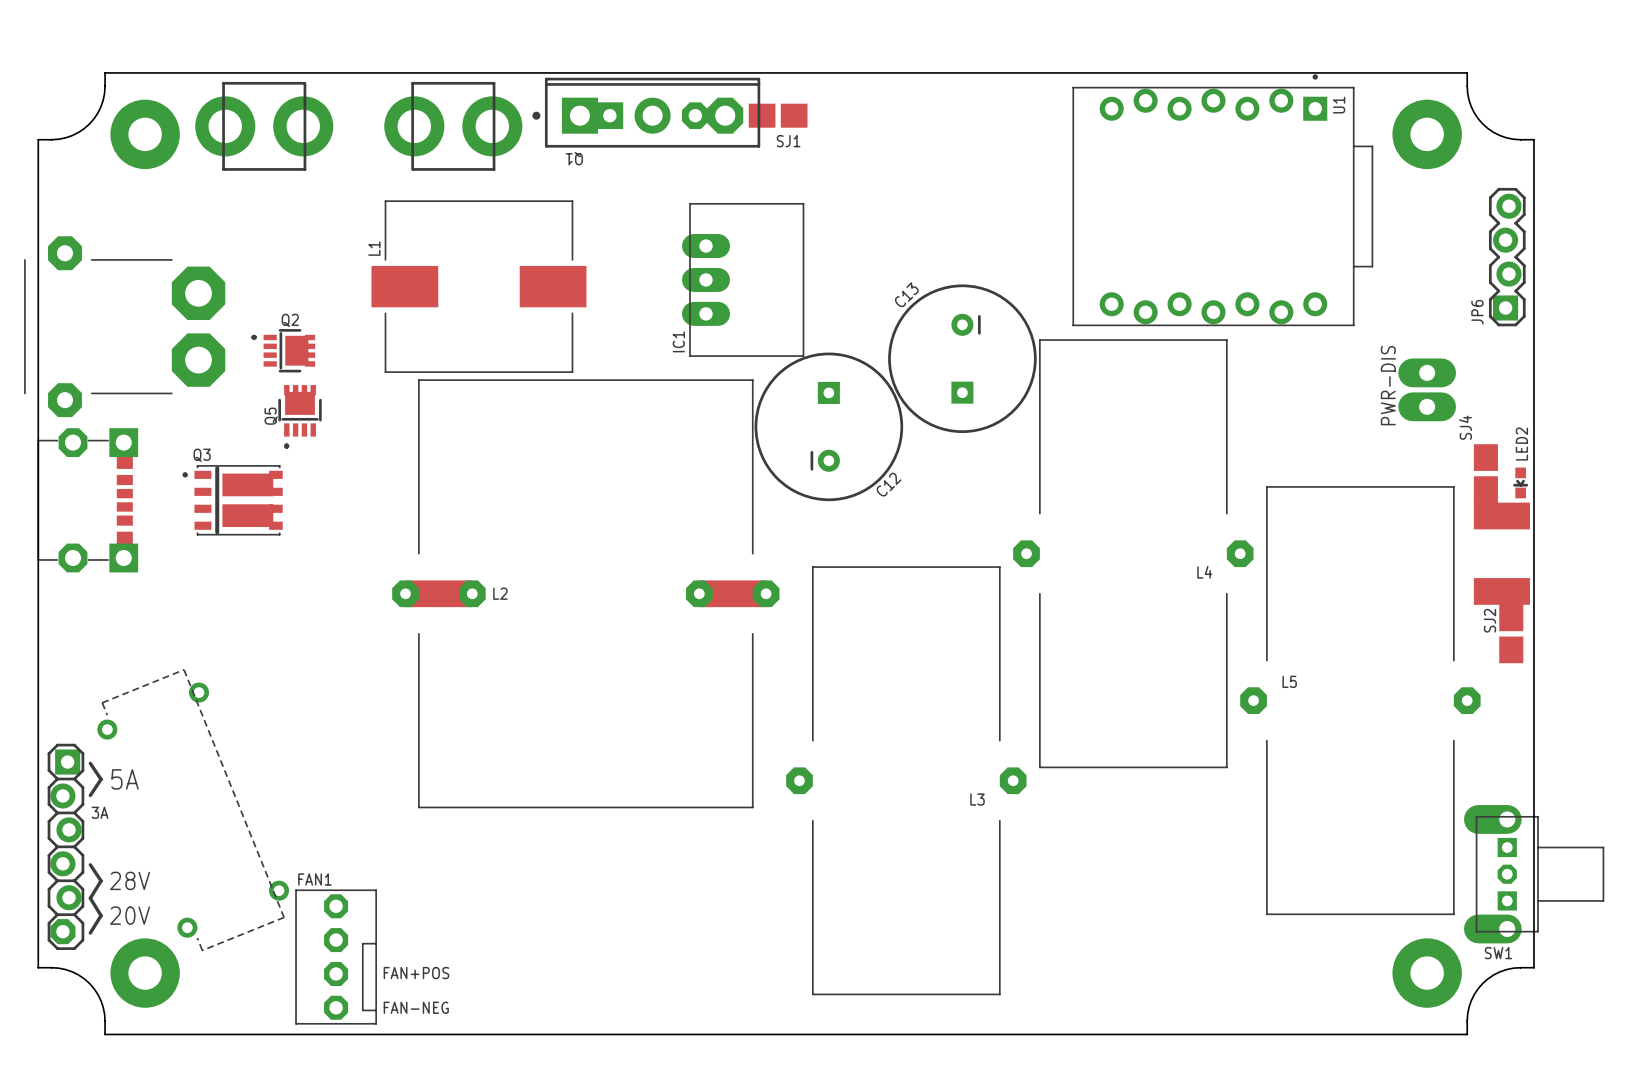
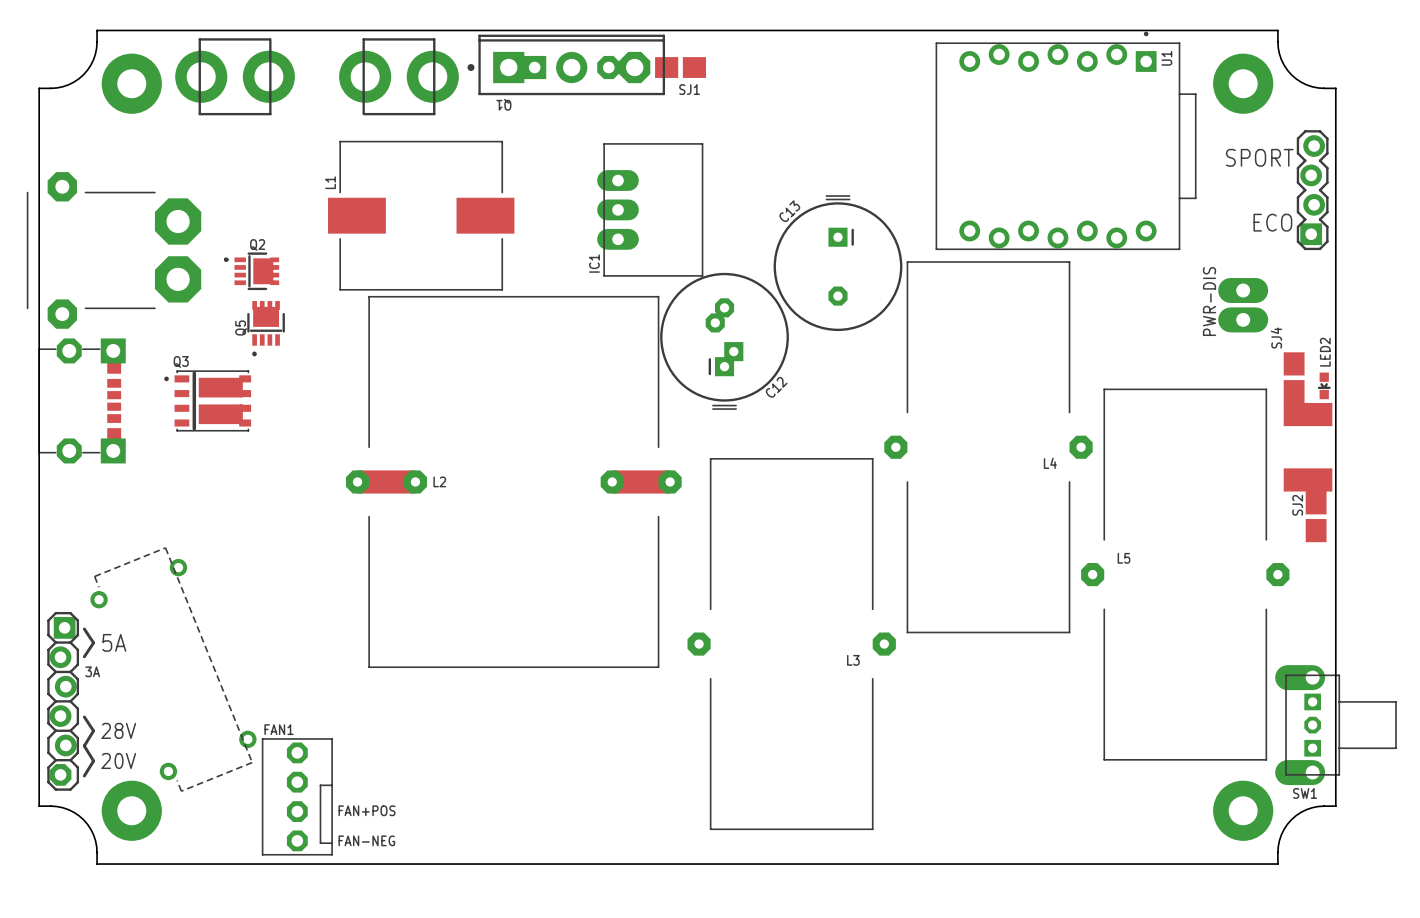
text: none -> SPORT (1259, 157)
C13 footprint: [888, 284, 1037, 434] -> [773, 195, 903, 332]
text: none -> ECO (1272, 222)
JP6 name: JP6 (1477, 312) -> none
C12 footprint: [754, 352, 904, 502] -> [660, 272, 789, 410]

